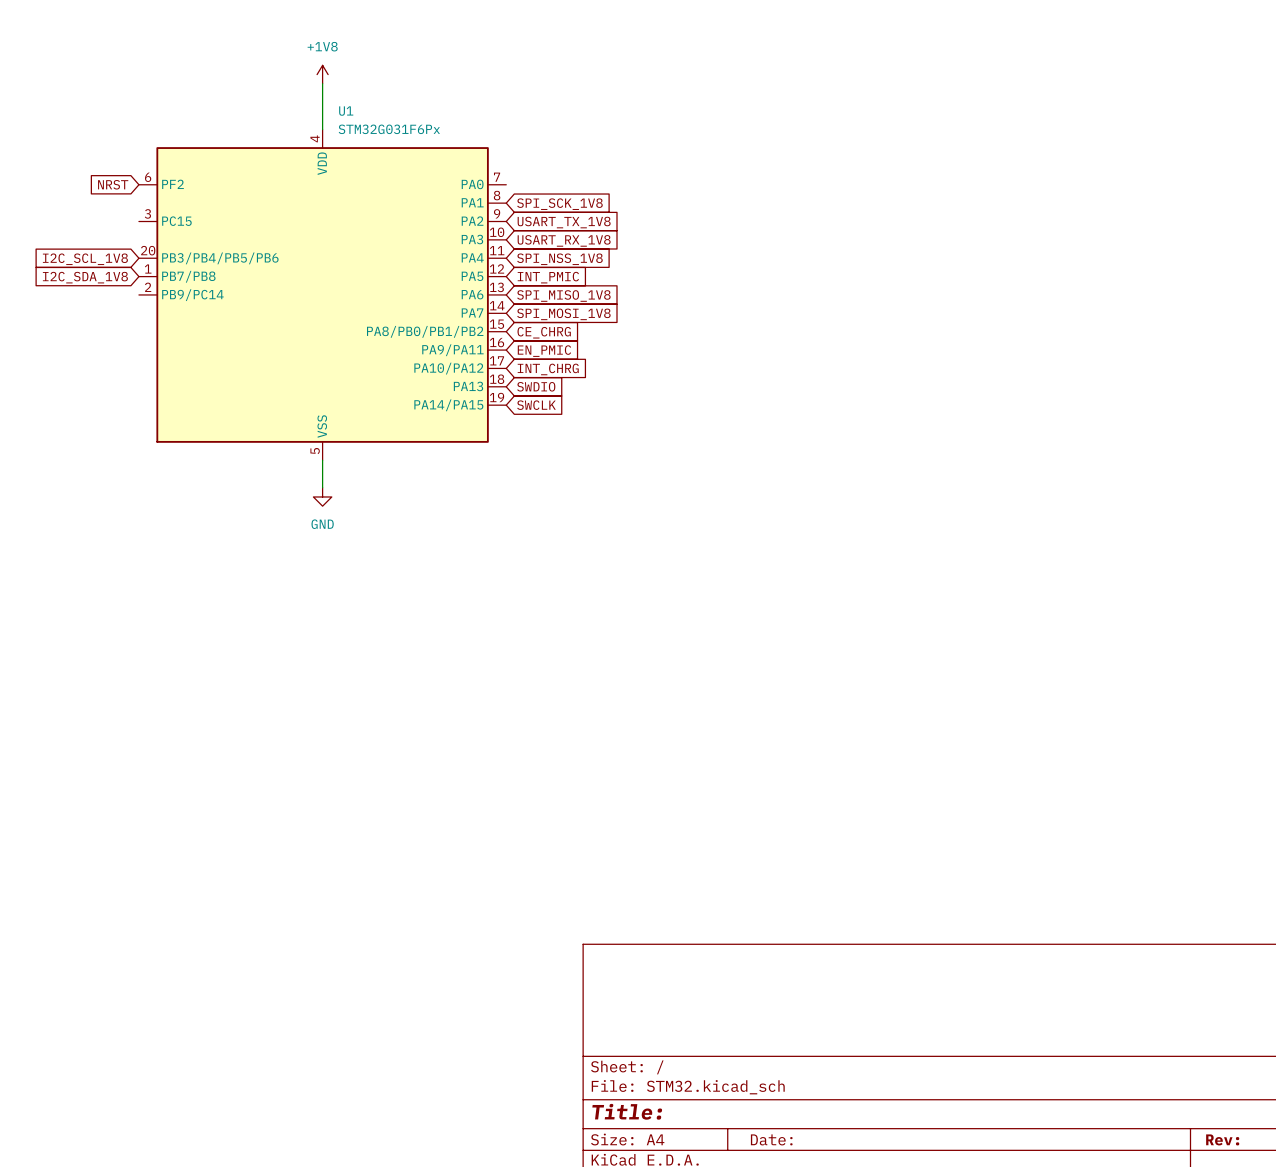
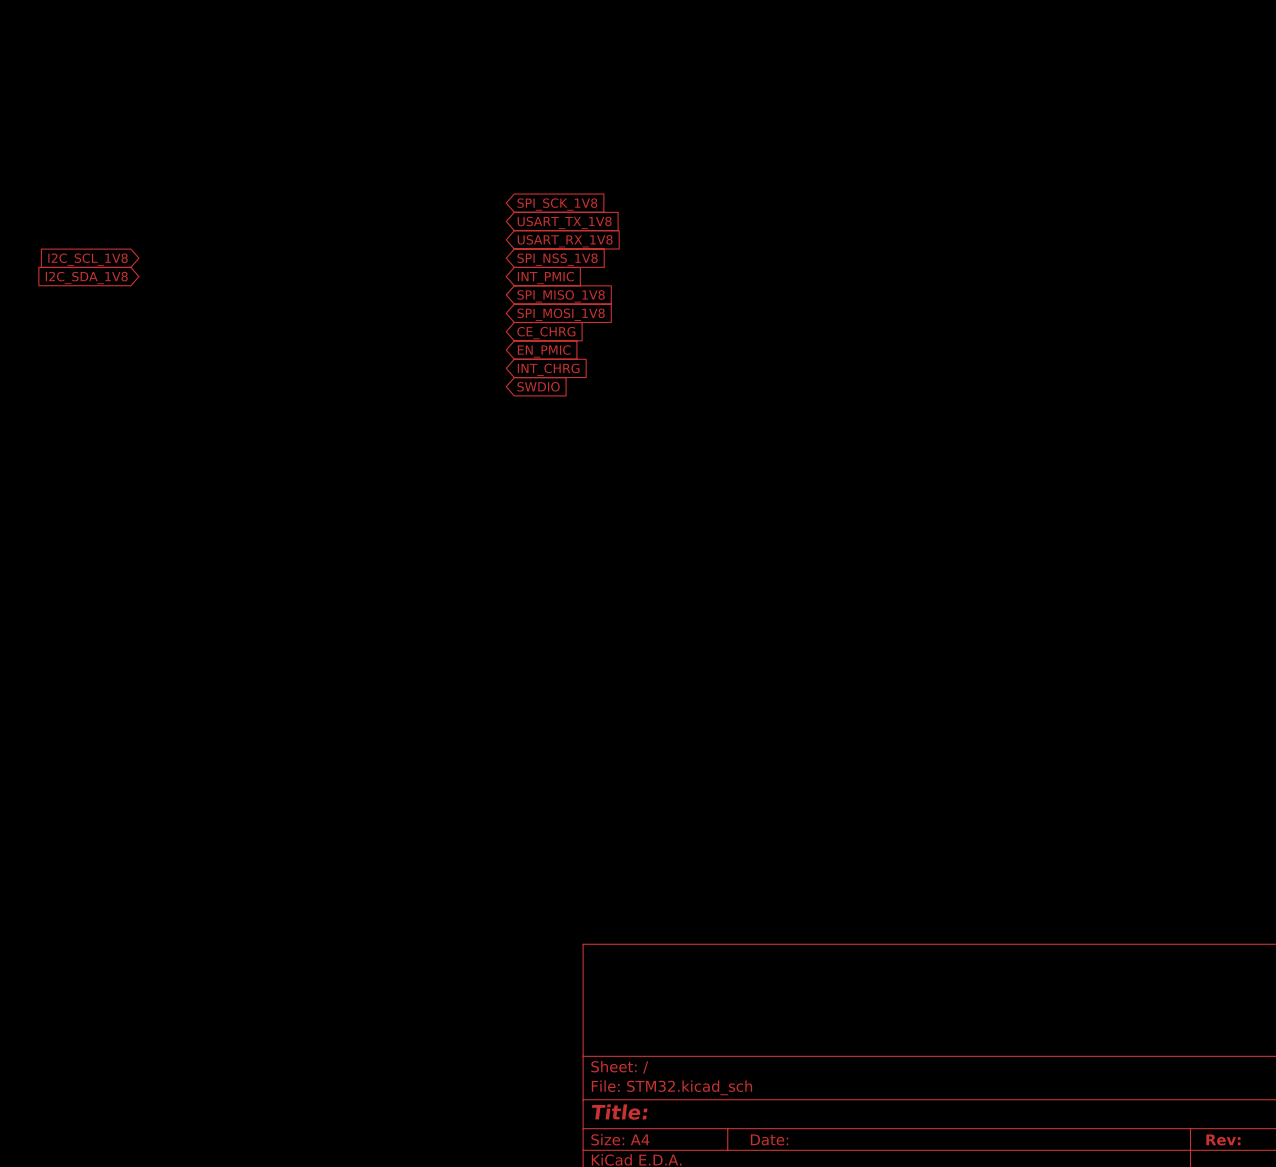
power symbol: +1V8 (322, 74) -> none
wire: (322, 83) (322, 129) -> none
global label: NRST (113, 184) -> none
U1: STM32G031F6Px (322, 294) -> none
global label: SWCLK (536, 405) -> none
wire: (322, 460) (322, 487) -> none
power symbol: GND (322, 496) -> none

